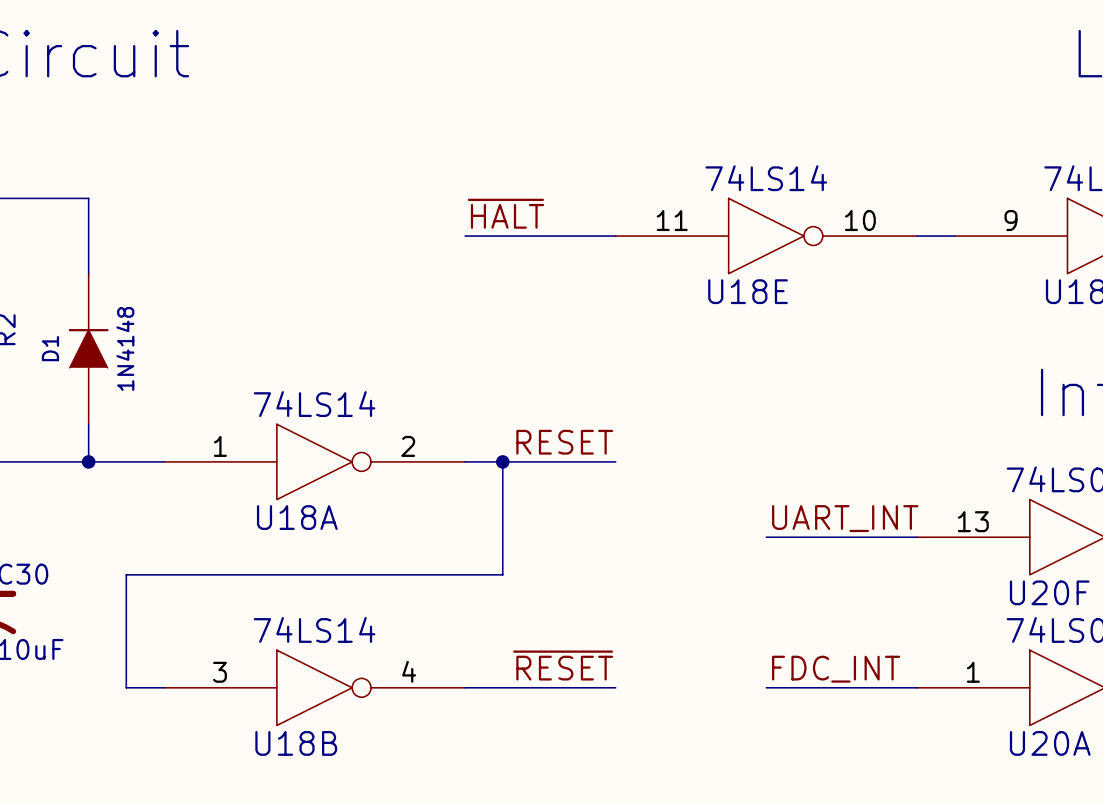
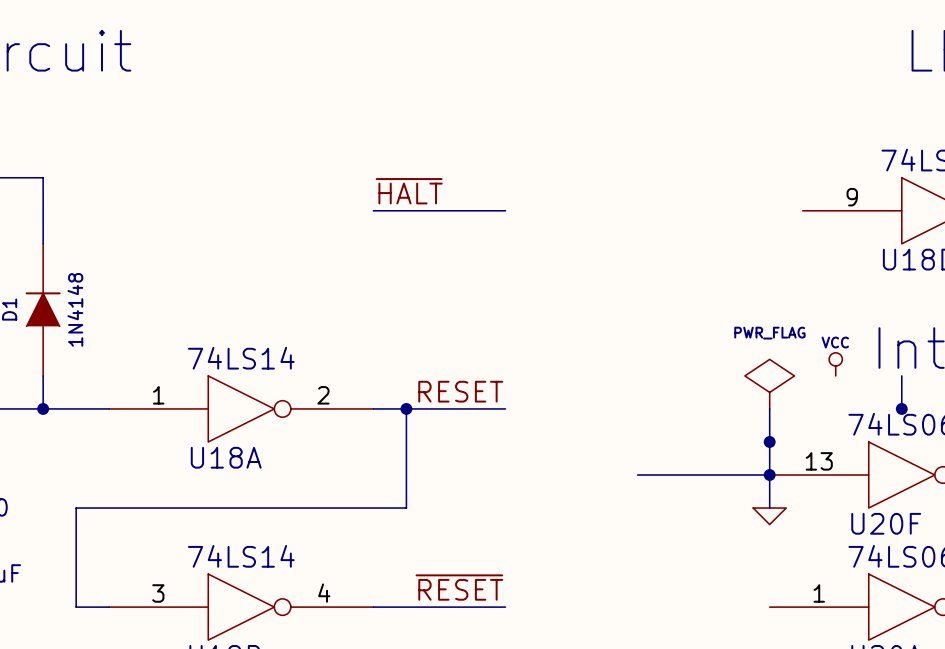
U18E: 74LS14 (766, 236) -> none
wire: (916, 236) (954, 236) -> none
power symbol: none -> VCC (835, 364)
wire: none -> (901, 375) (901, 408)
power symbol: none -> PWR_FLAG (769, 384)
wire: none -> (769, 408) (769, 508)
junction: none -> (901, 408)
junction: none -> (769, 441)
label: UART_INT (845, 518) -> none
junction: none -> (769, 475)
power symbol: none -> (769, 516)
label: FDC_INT (836, 669) -> none
wire: (766, 687) (916, 687) -> none

